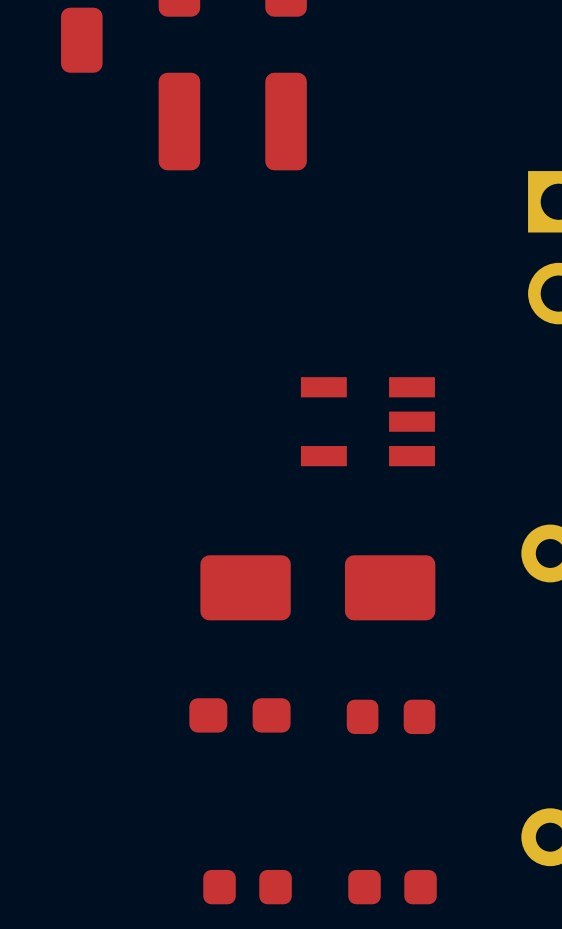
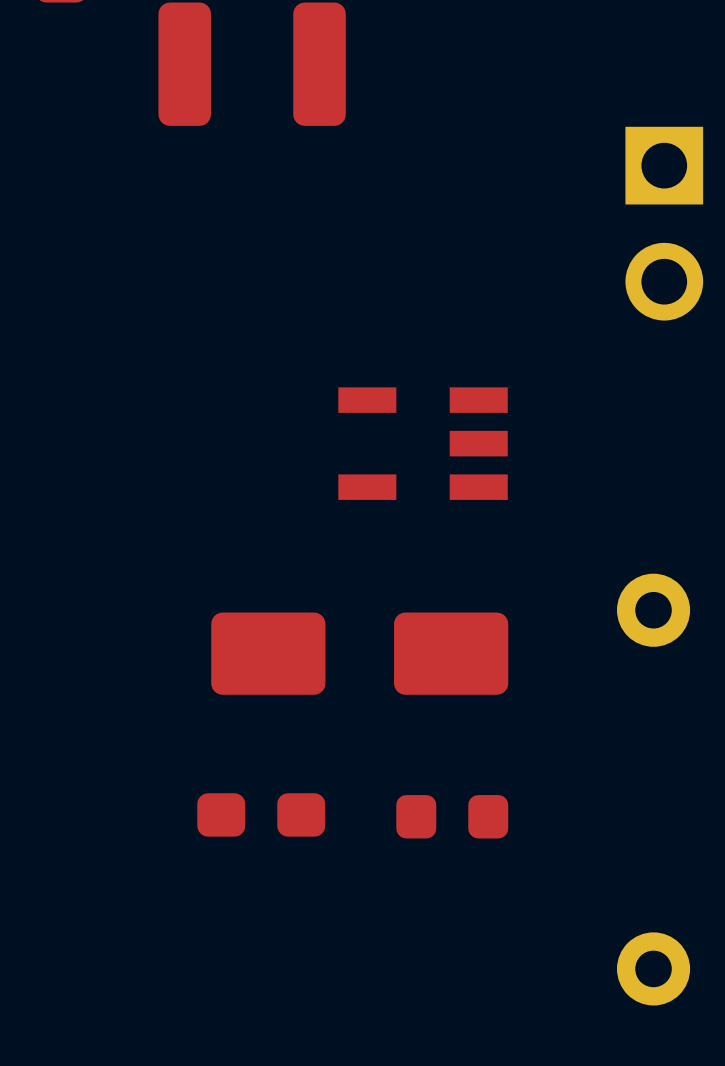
part: (247, 887) -> none
part: (392, 887) -> none

